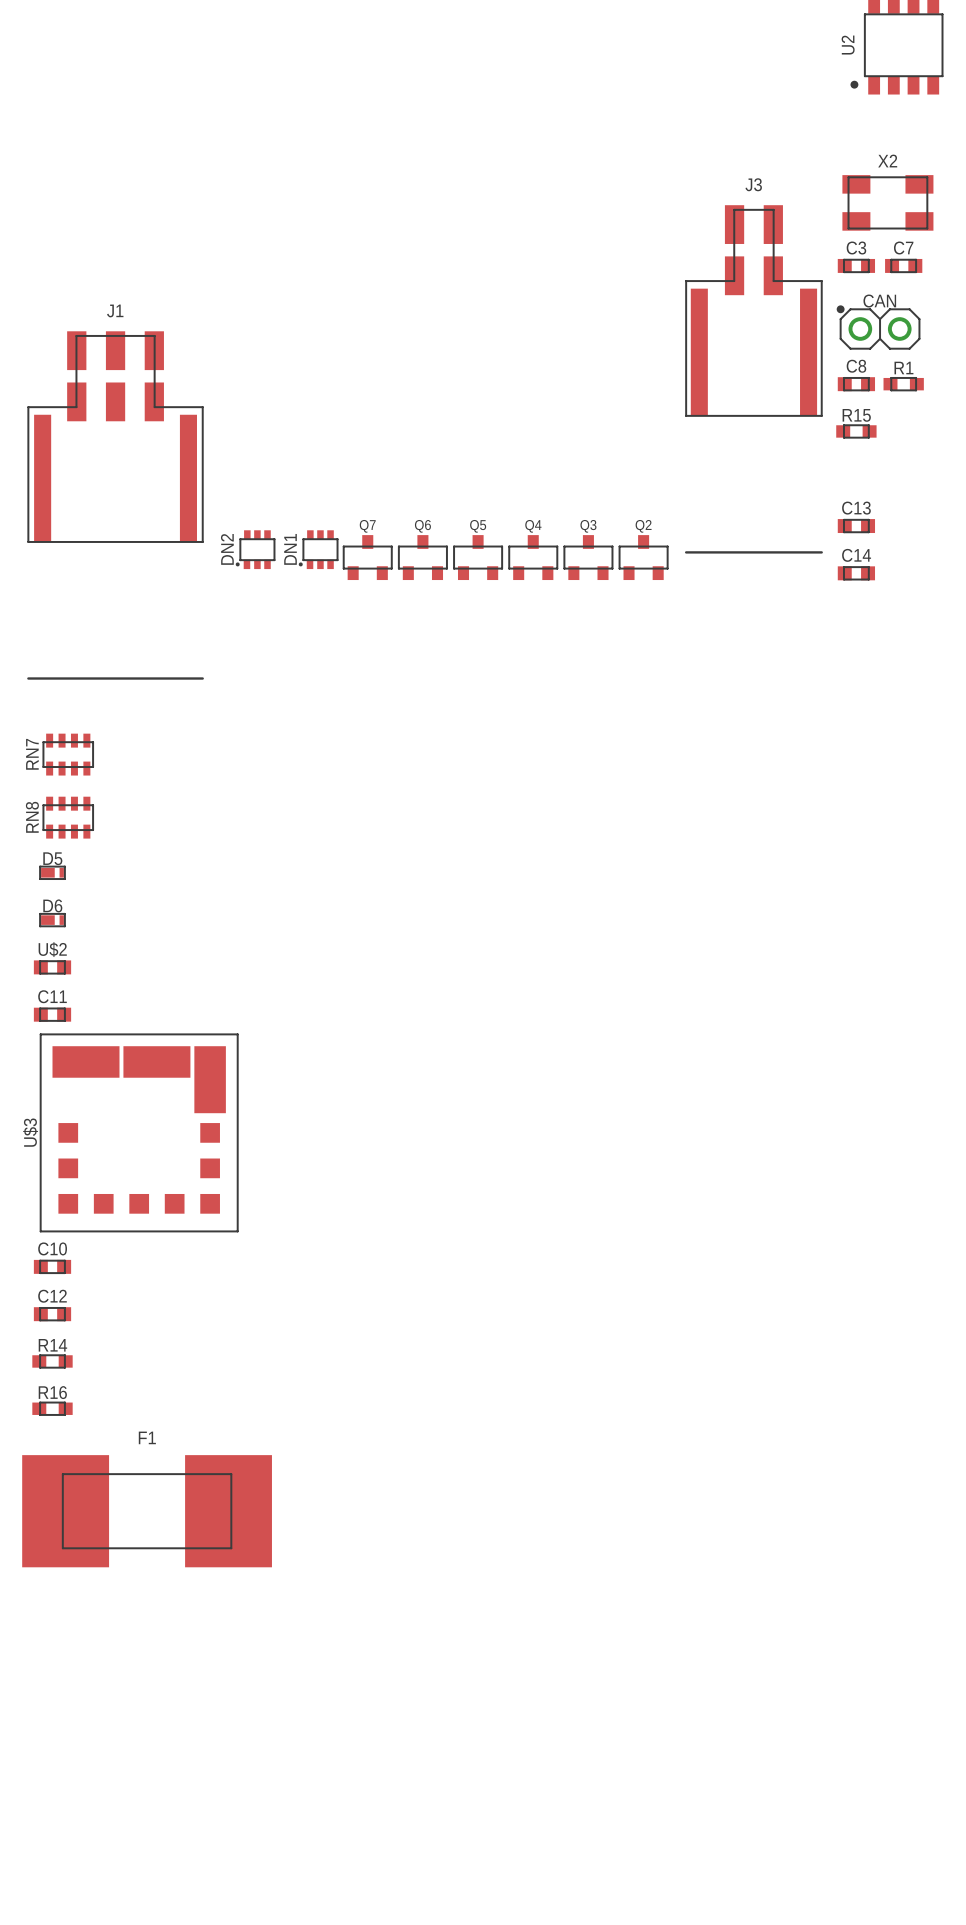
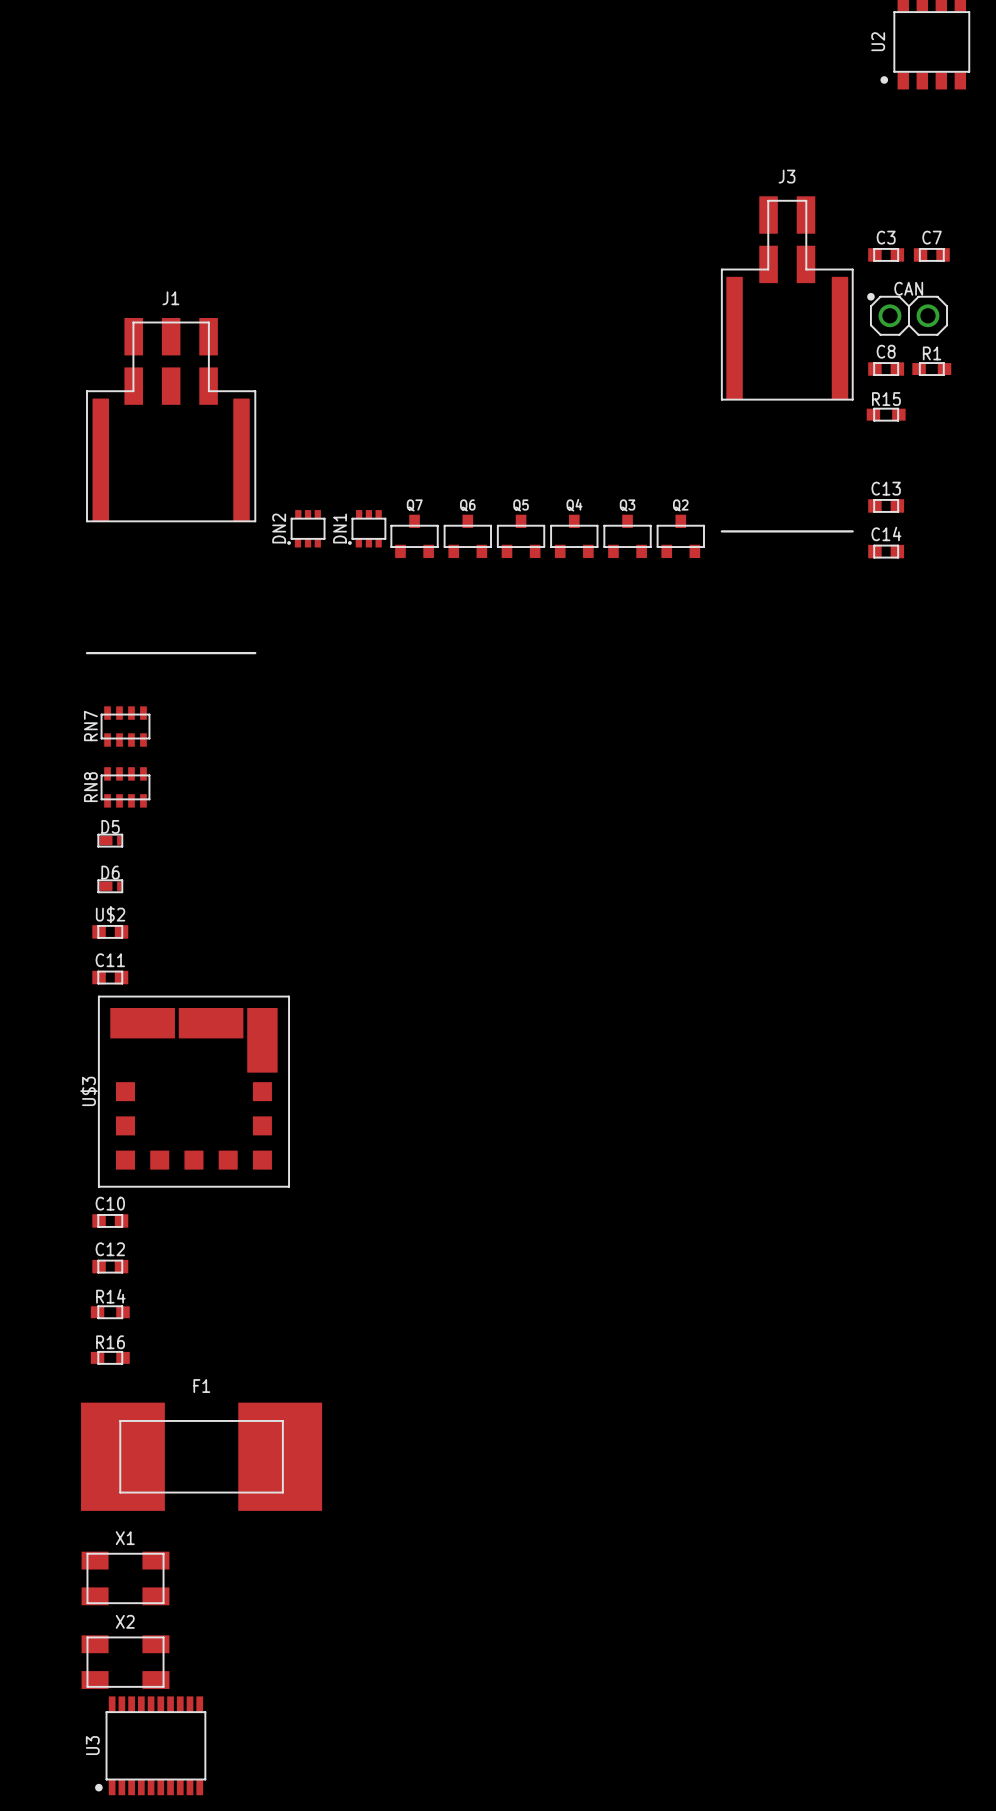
X2 position: (887, 202) -> (125, 1662)
X1: none -> (125, 1578)
U3: none -> (150, 1745)

